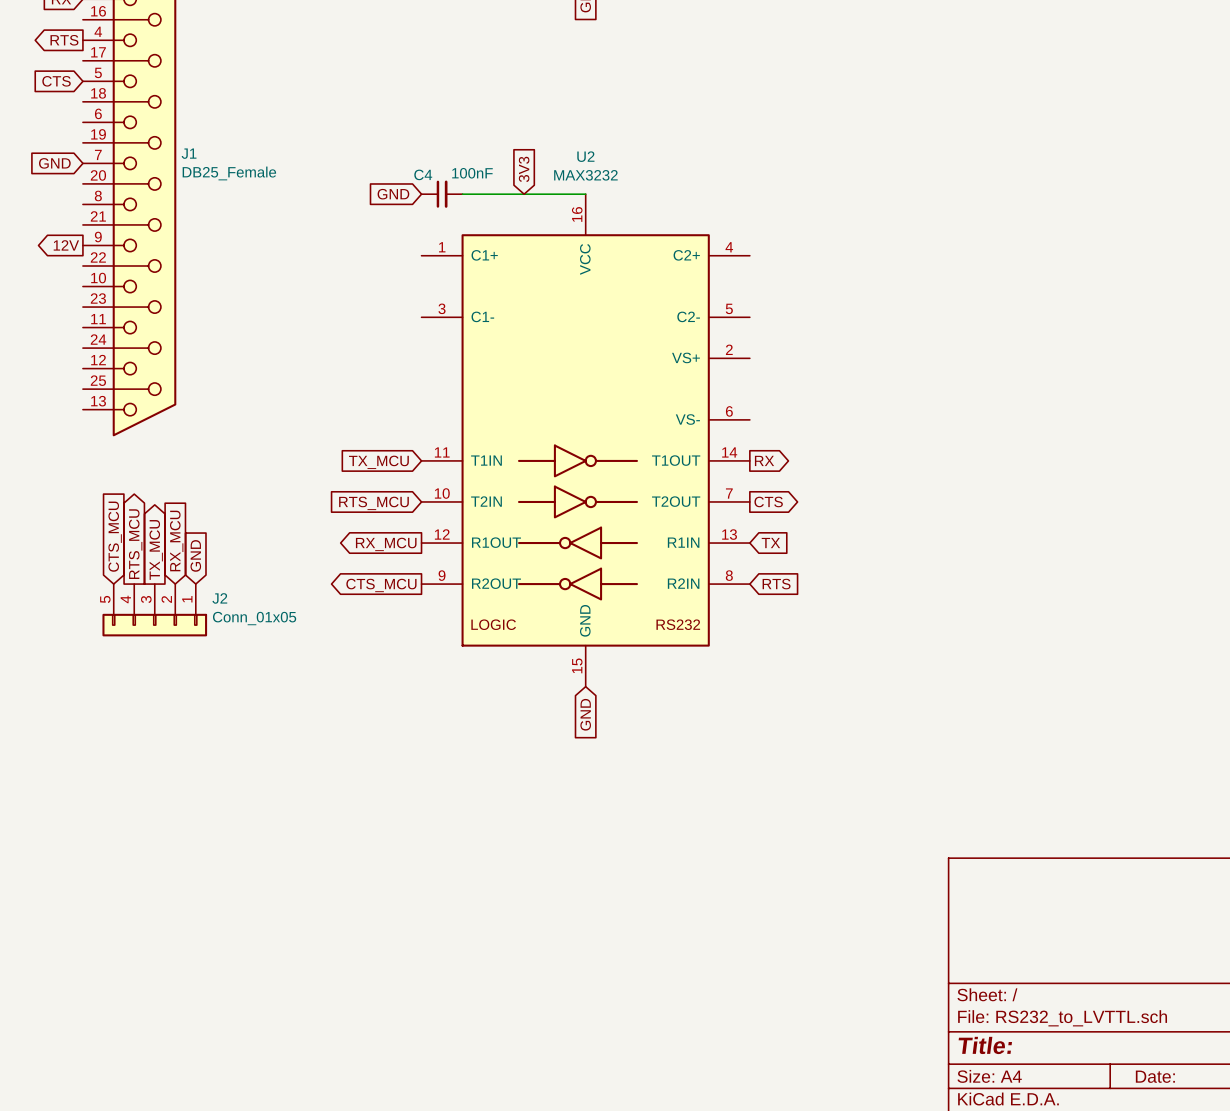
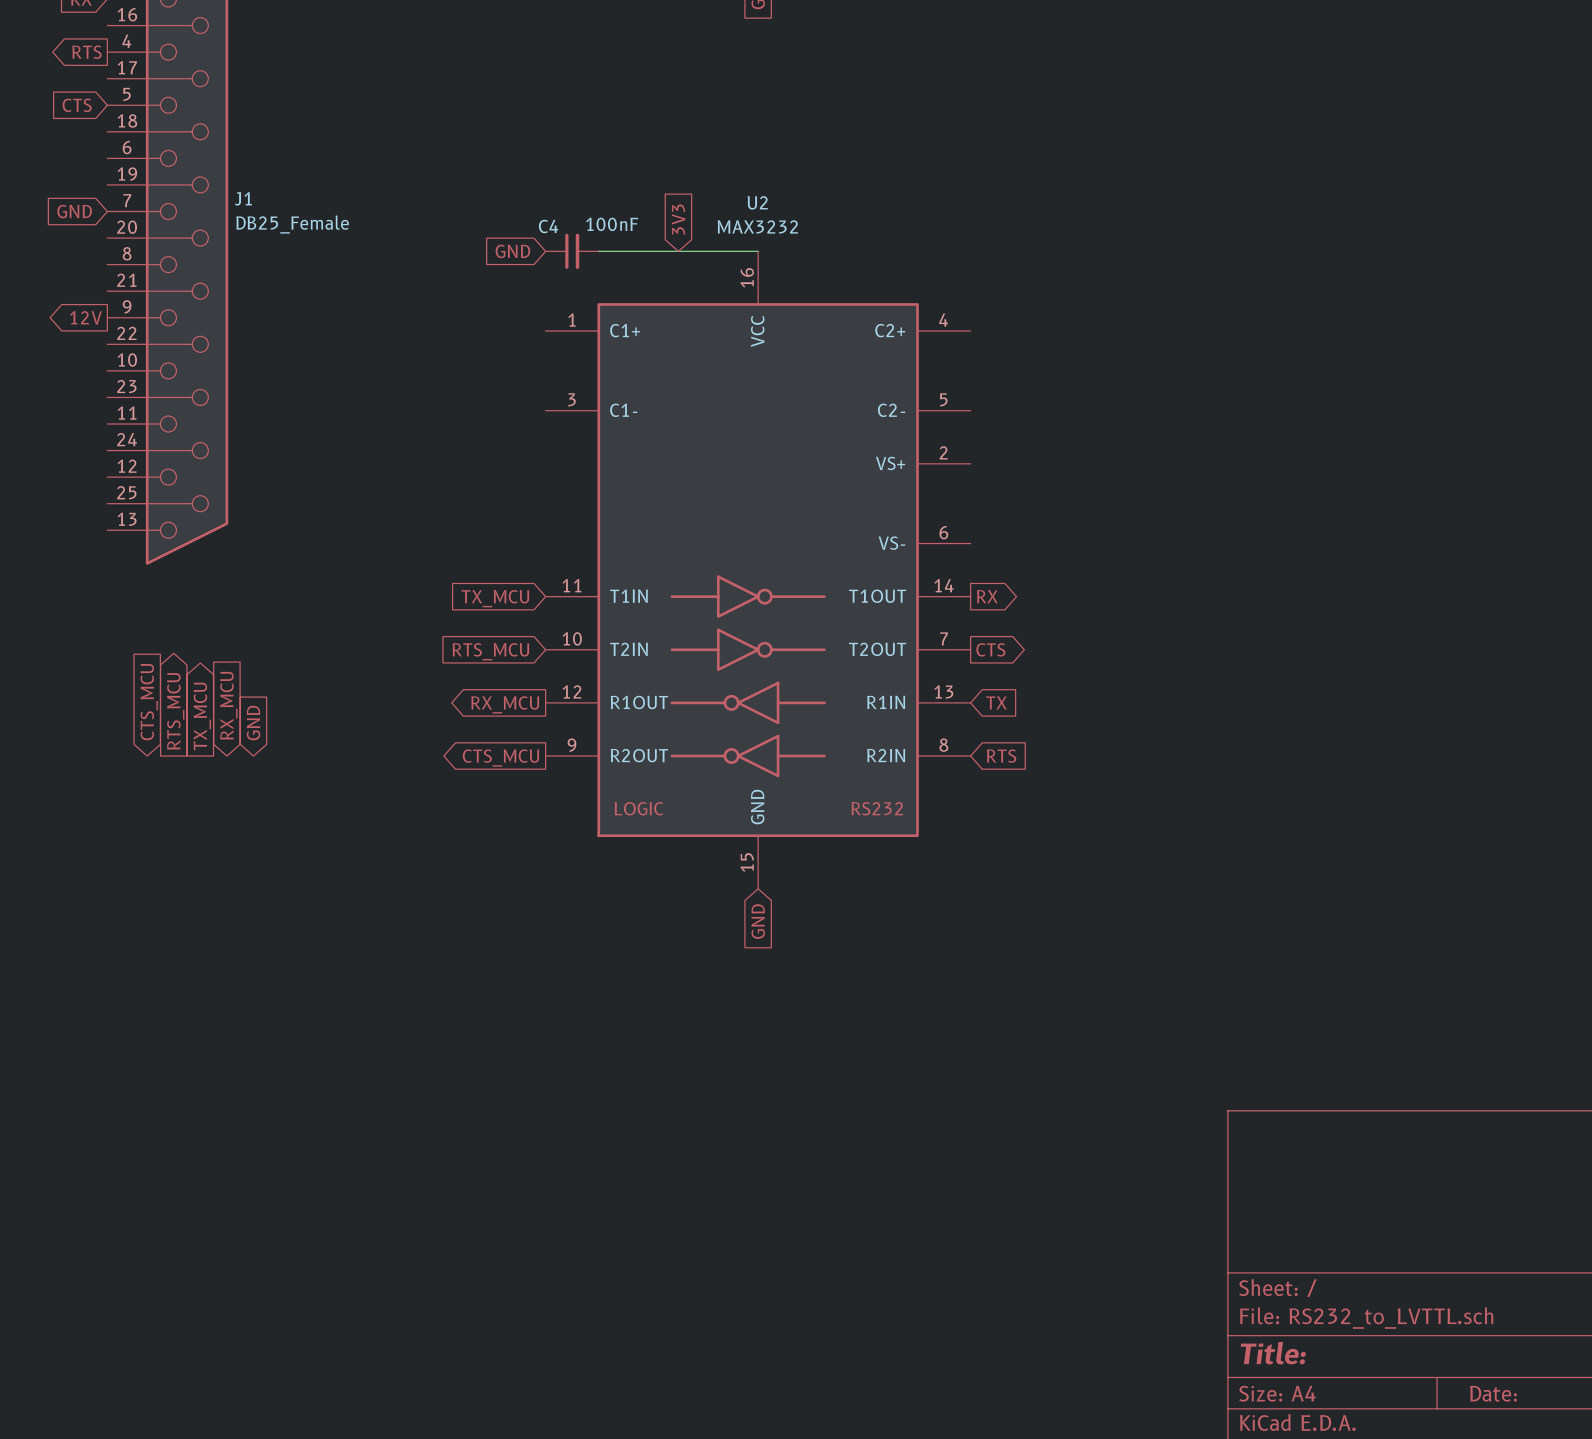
J2: Conn_01x05 (154, 610) -> none

